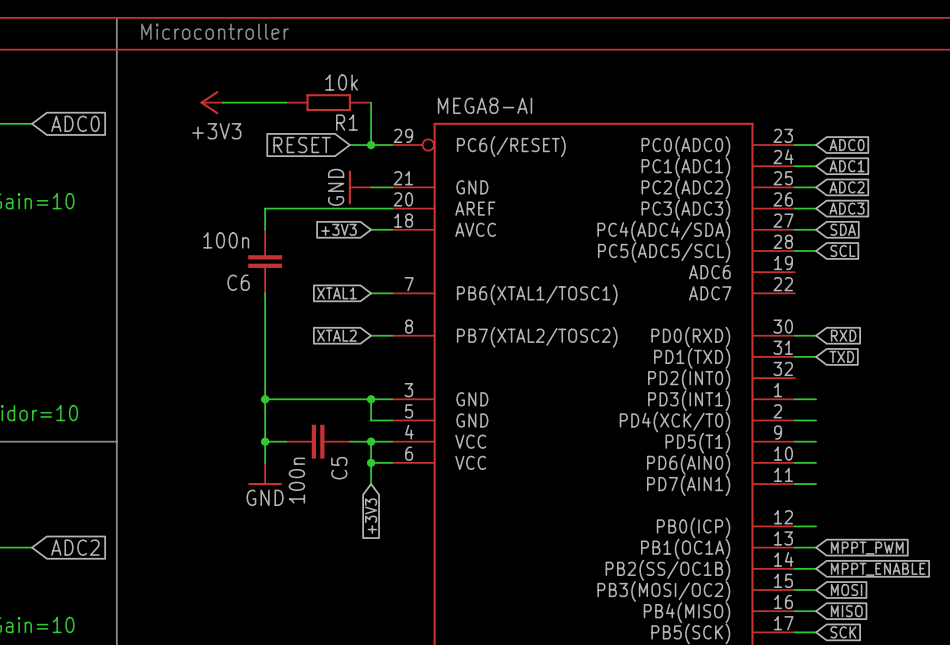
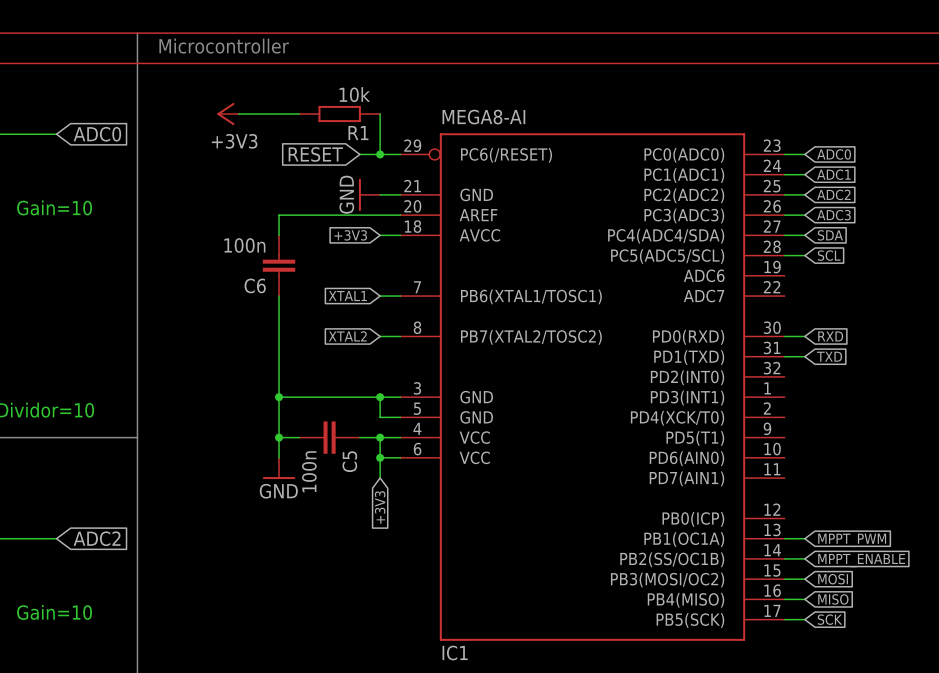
wire: (794, 399) (816, 399) -> none
wire: (794, 420) (816, 420) -> none
wire: (794, 441) (816, 441) -> none
wire: (794, 462) (816, 462) -> none
wire: (794, 484) (816, 484) -> none
wire: (794, 526) (816, 526) -> none

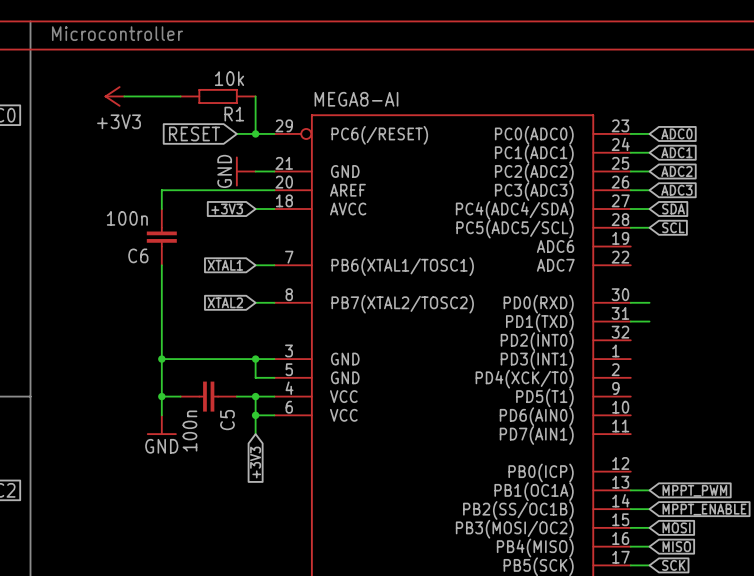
global label: RXD (830, 336) -> none
global label: TXD (829, 356) -> none

